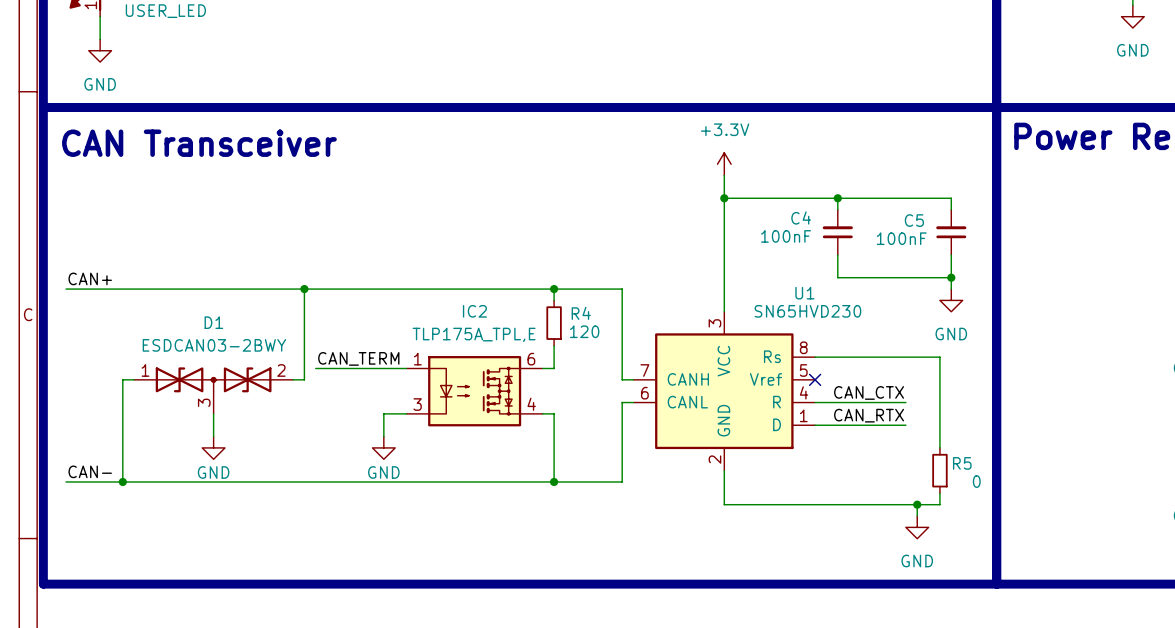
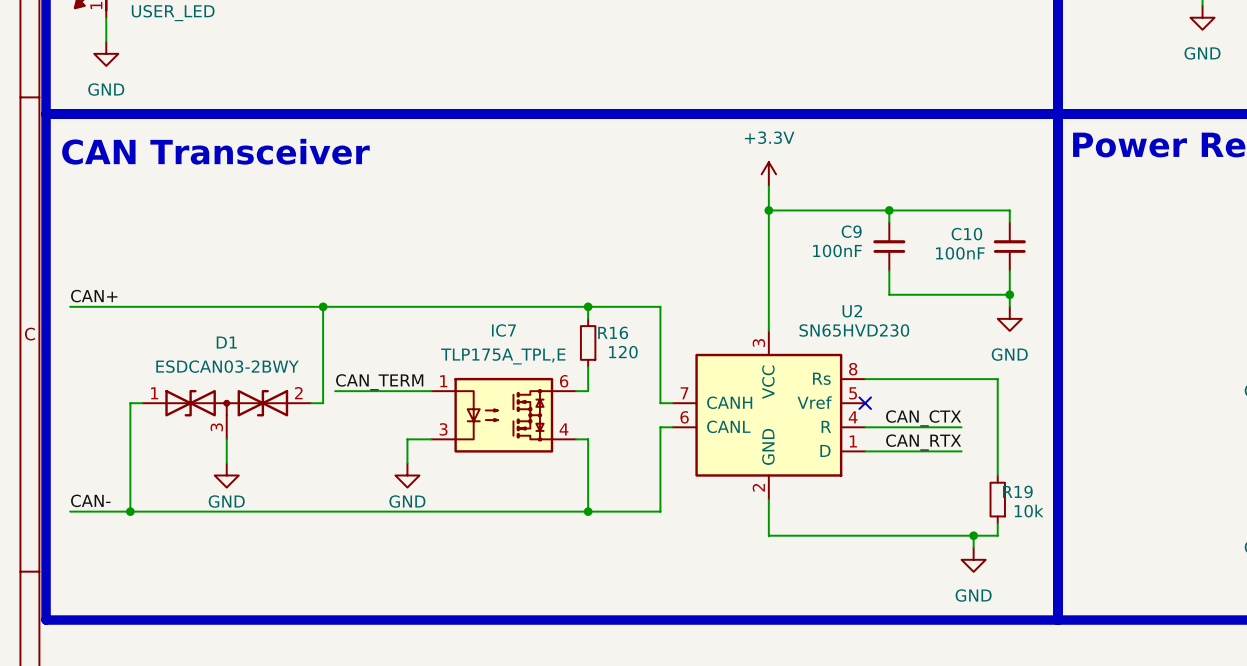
C4 name: C4 (801, 218) -> C9 (851, 231)
C5 name: C5 (914, 220) -> C10 (966, 234)
U1 name: U1 (804, 293) -> U2 (852, 311)
IC2 name: IC2 (474, 311) -> IC7 (503, 330)
R4 name: R4 (581, 313) -> R16 (613, 332)
R5 name: R5 (962, 463) -> R19 (1017, 491)
R5 value: 0 (976, 481) -> 10k (1029, 511)

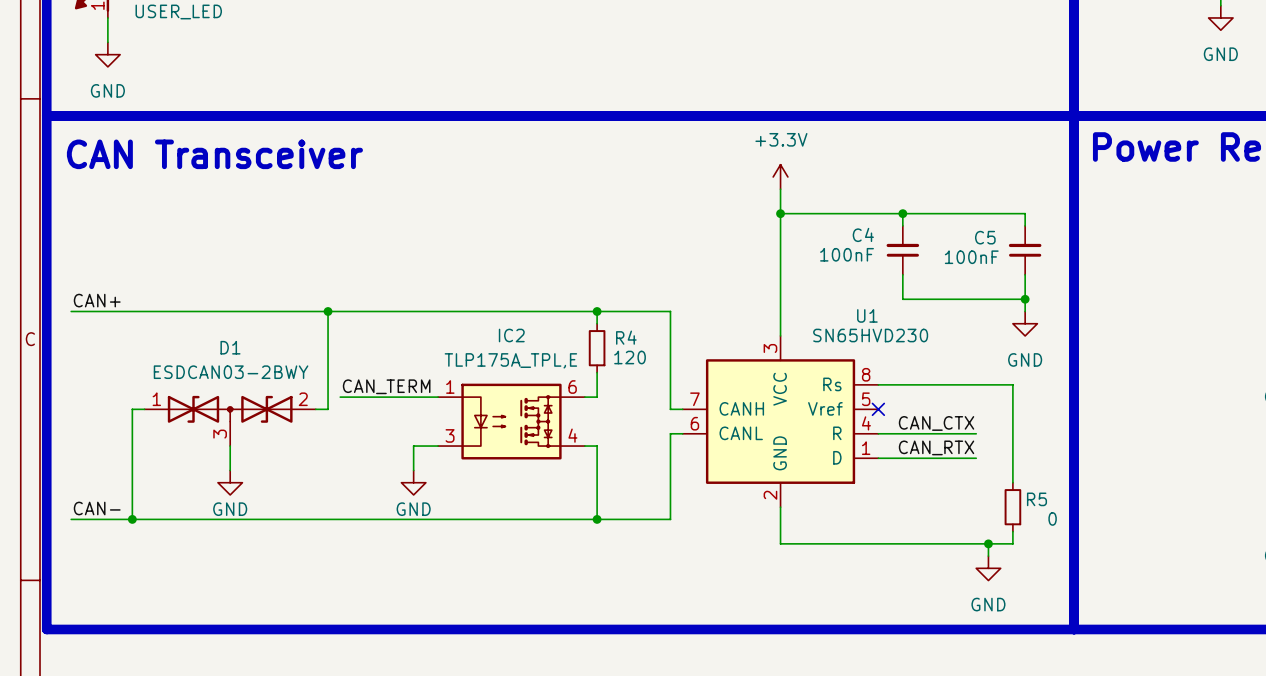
C9 name: C9 (851, 231) -> C4 (863, 234)
C10 name: C10 (966, 234) -> C5 (985, 237)
U2 name: U2 (852, 311) -> U1 (867, 315)
IC7 name: IC7 (503, 330) -> IC2 (511, 335)
R16 name: R16 (613, 332) -> R4 (626, 337)
R19 name: R19 (1017, 491) -> R5 (1036, 499)
R19 value: 10k (1029, 511) -> 0 (1052, 518)

